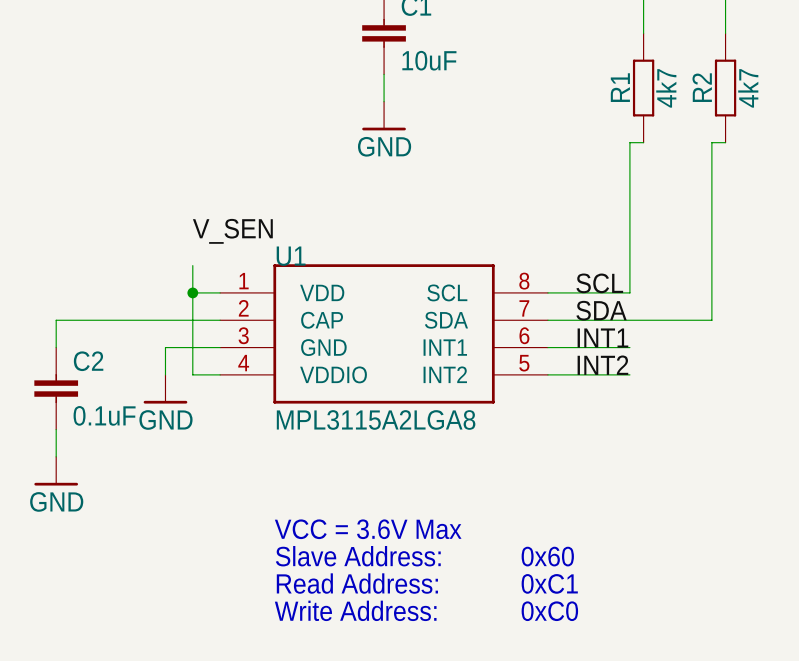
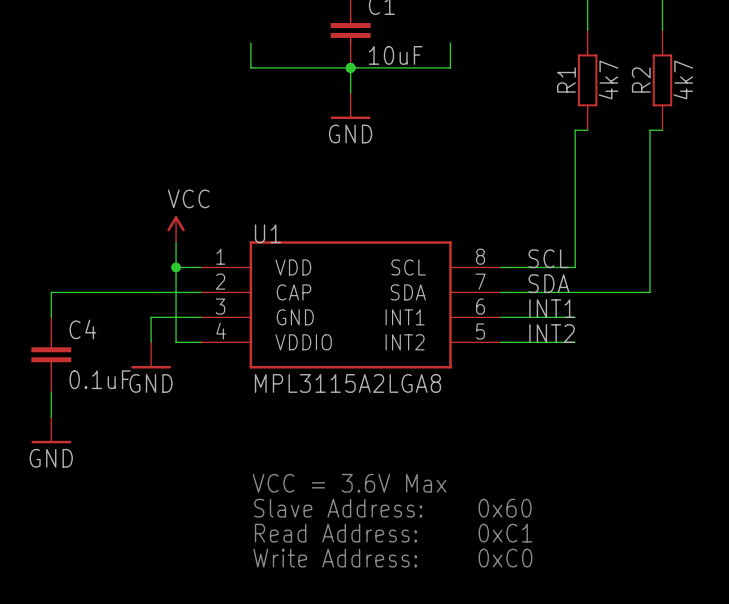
wire: none -> (250, 42) (250, 67) (450, 67) (450, 42)
junction: none -> (350, 67)
label: V_SEN (232, 231) -> none
power symbol: none -> VCC (176, 229)
C2 name: C2 (88, 361) -> C4 (82, 329)

